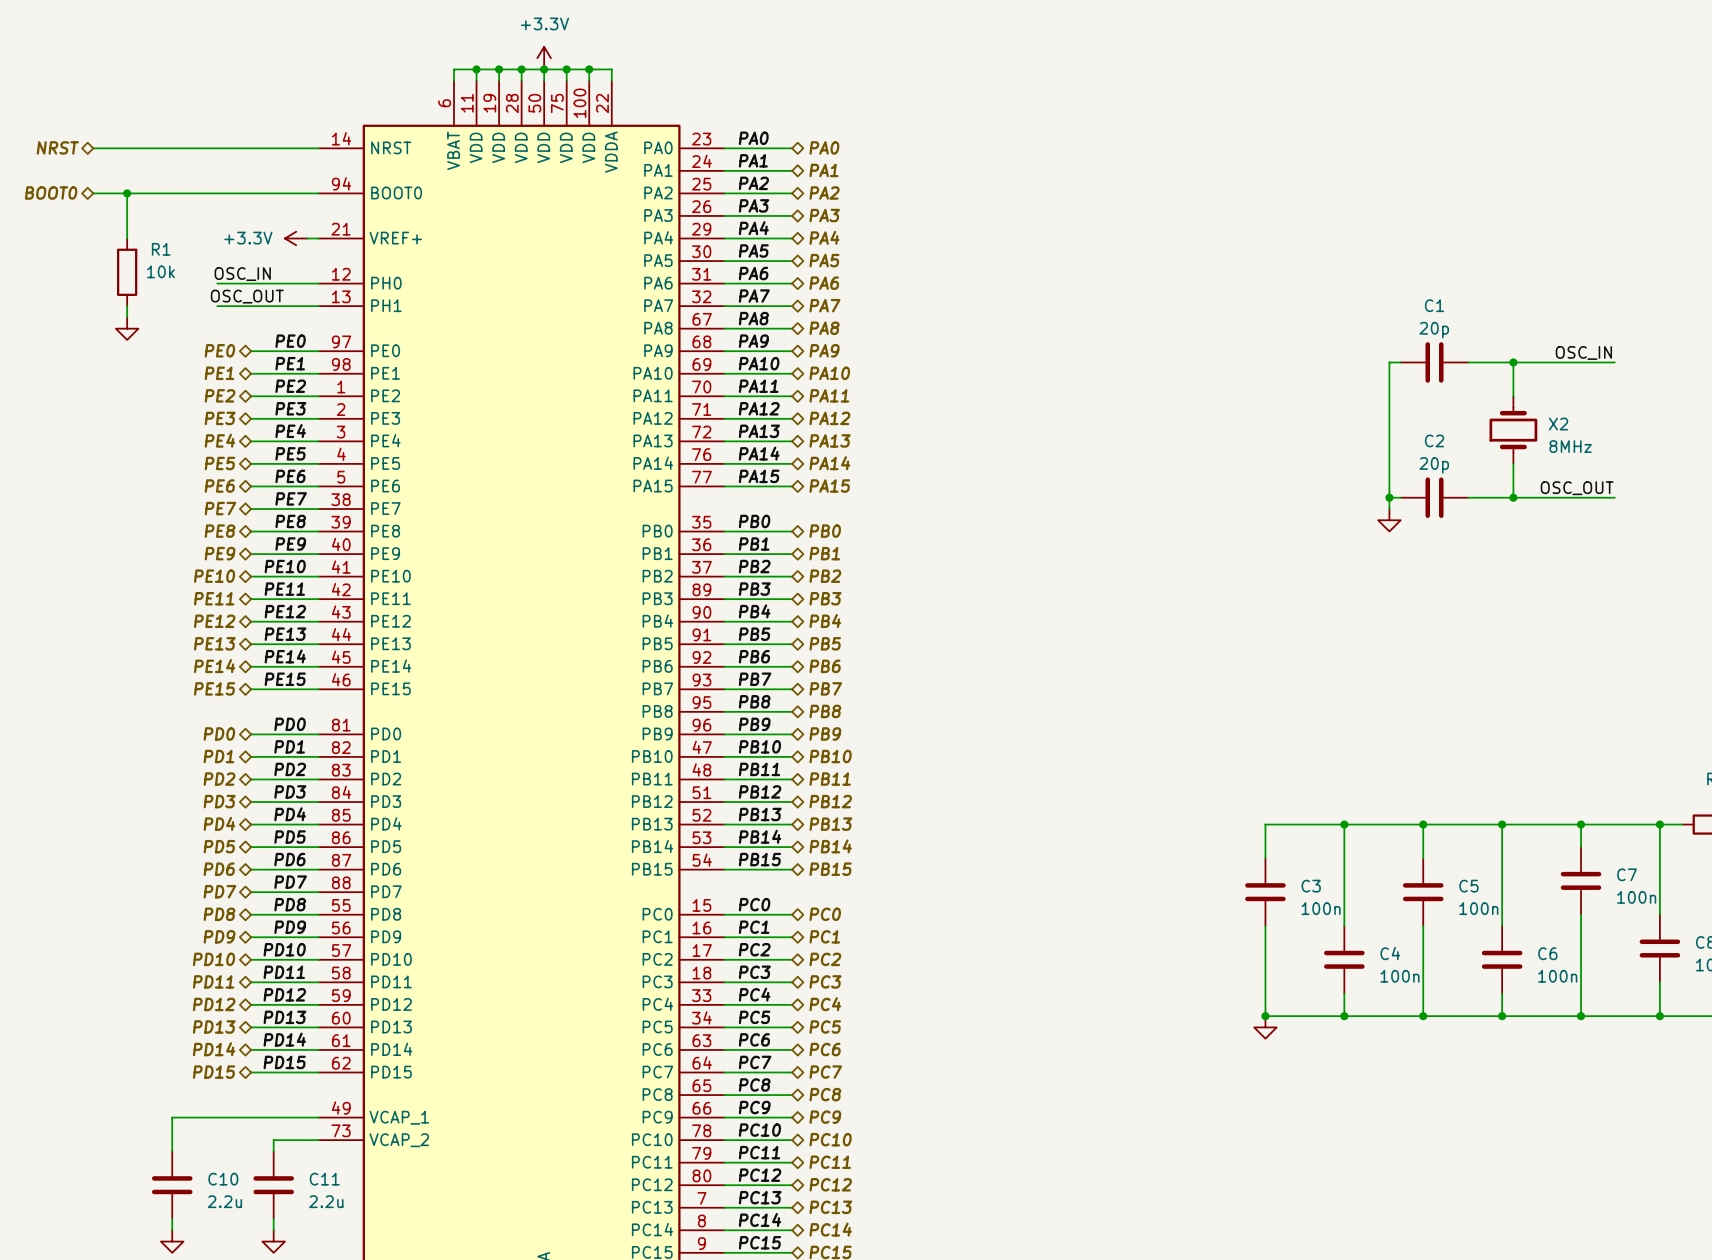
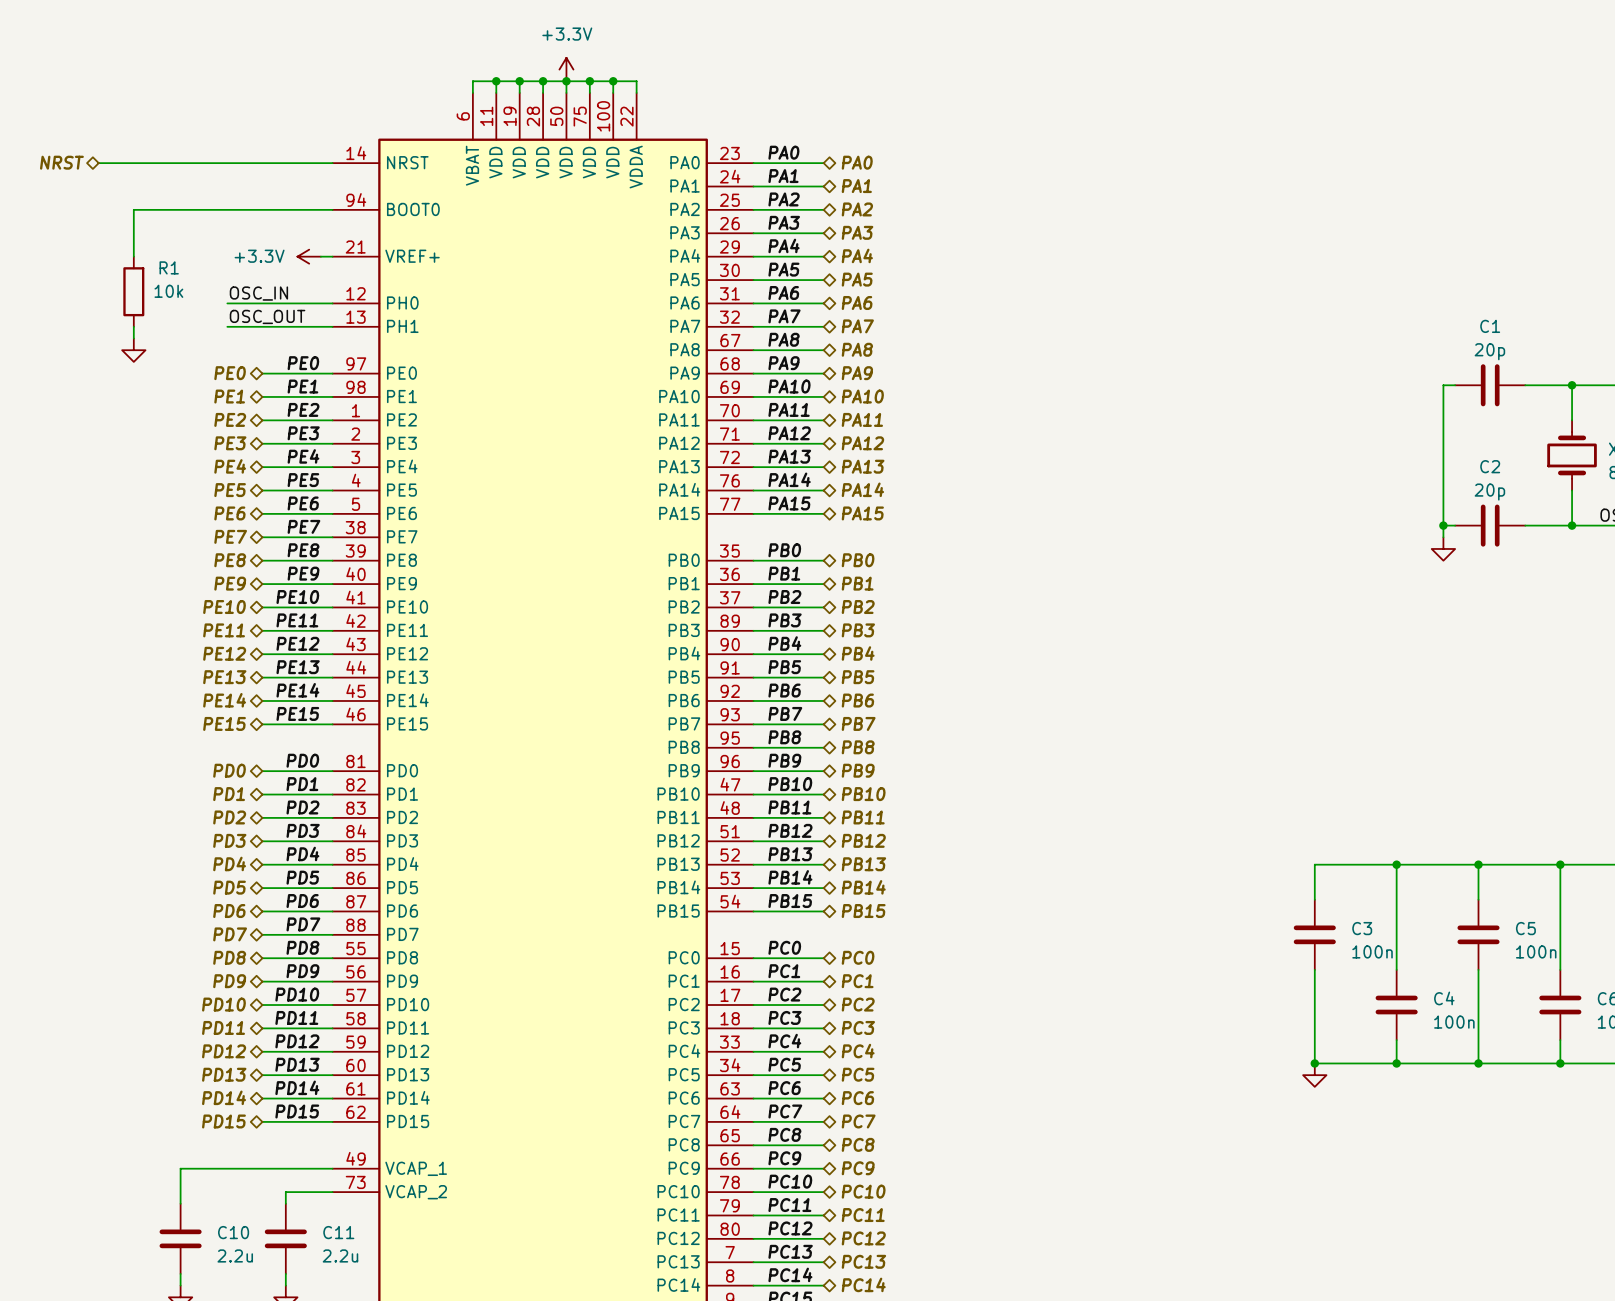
hierarchical label: BOOT0 (51, 193) -> none
wire: (93, 193) (127, 193) -> none
junction: (127, 193) -> none
label position: OSC_IN (242, 274) -> OSC_IN (258, 293)
label position: OSC_OUT (247, 296) -> OSC_OUT (267, 316)

